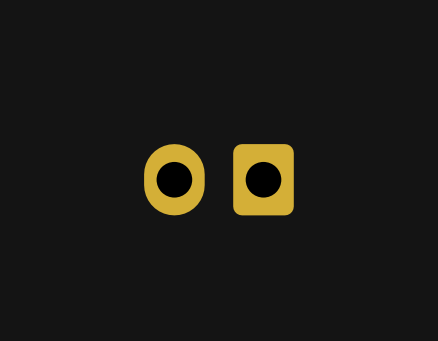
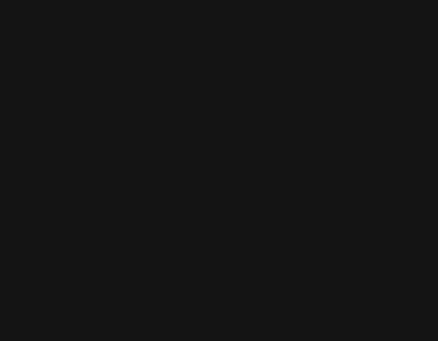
part: (218, 179) -> none

